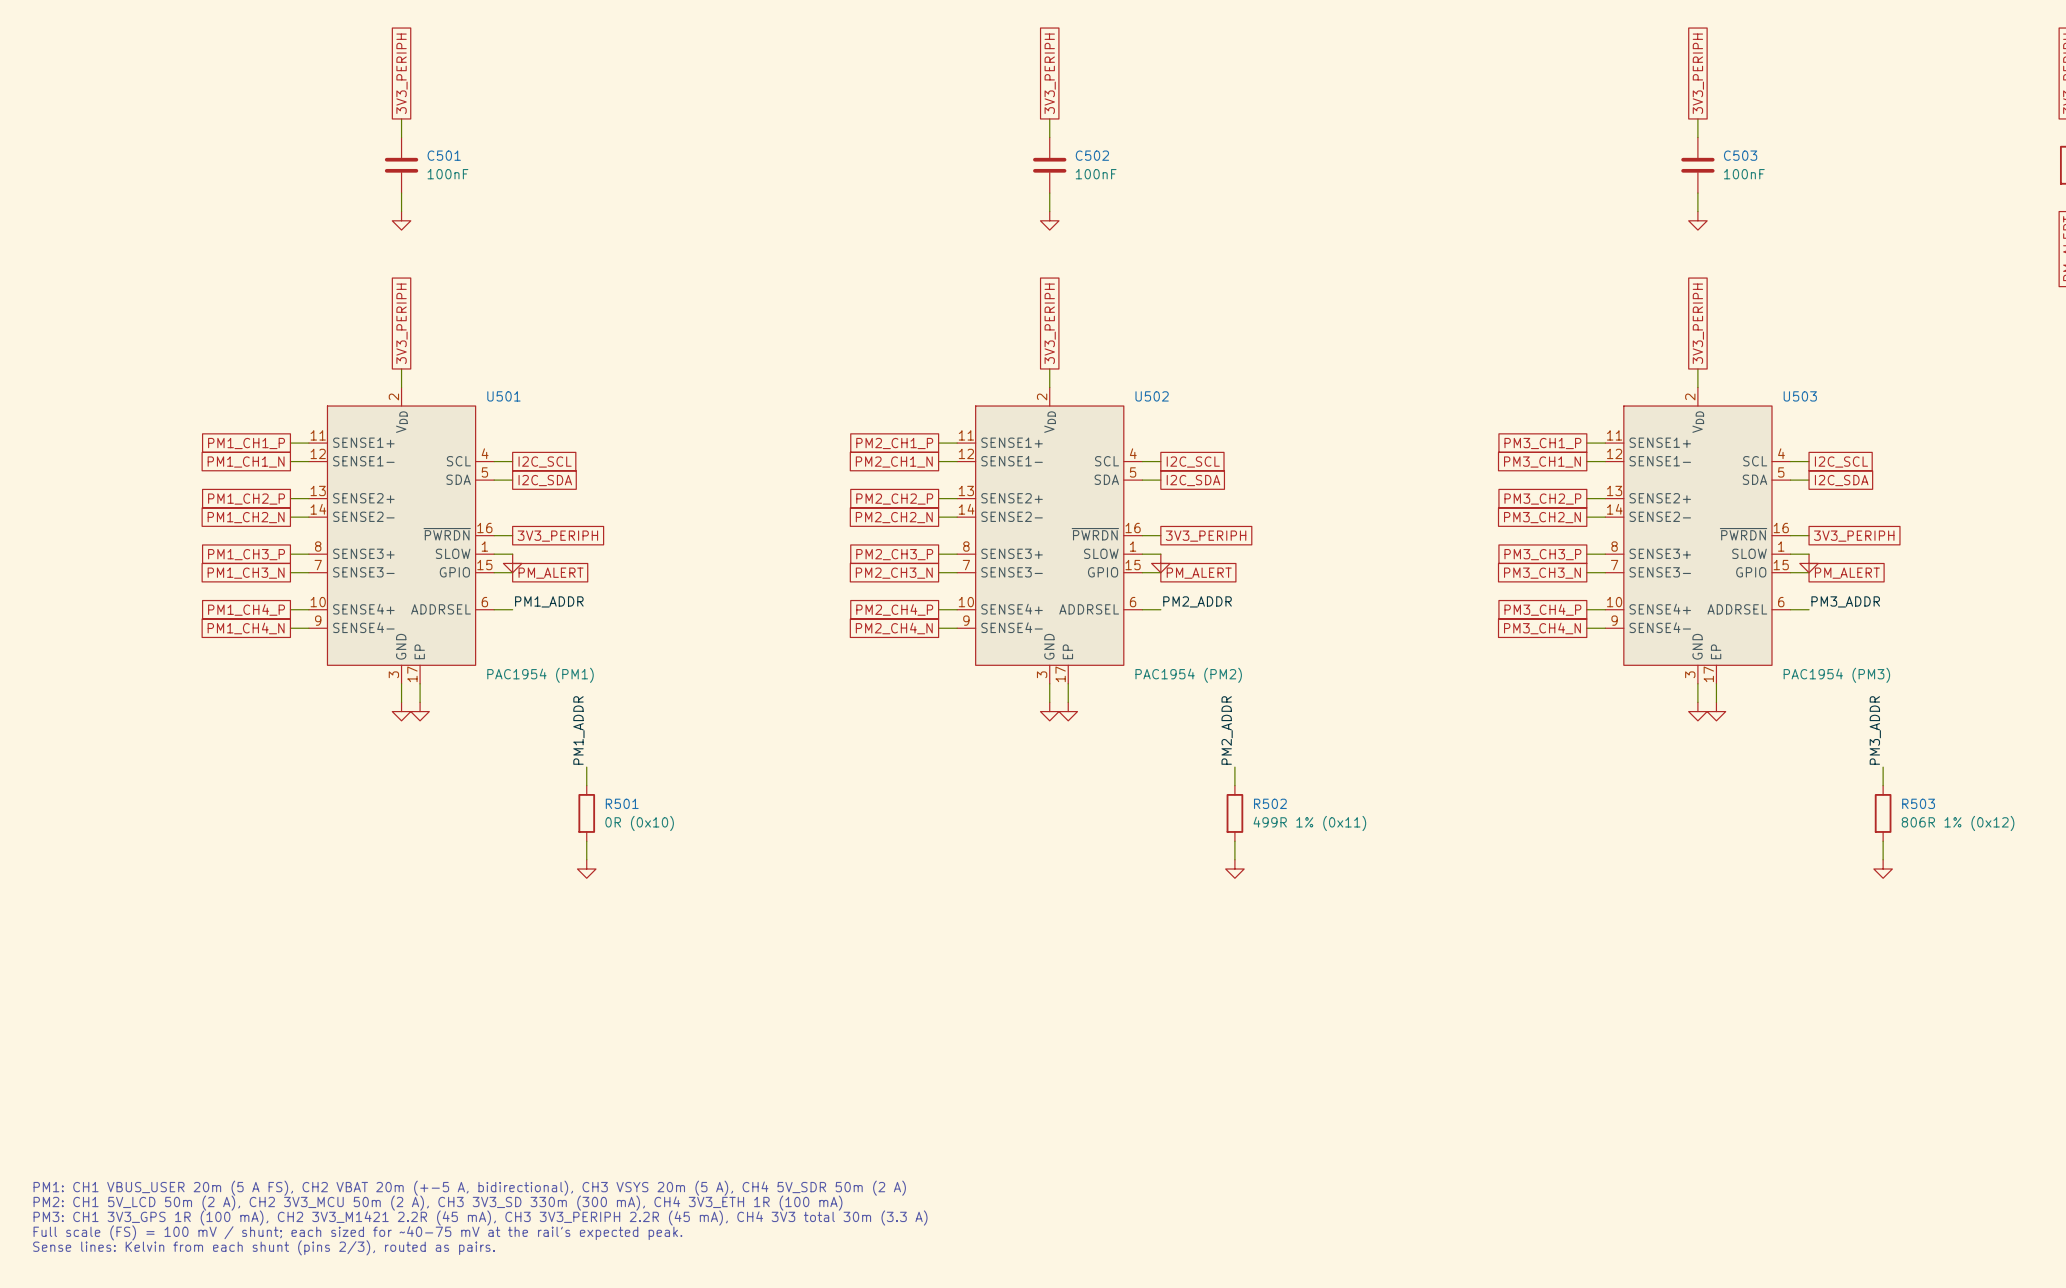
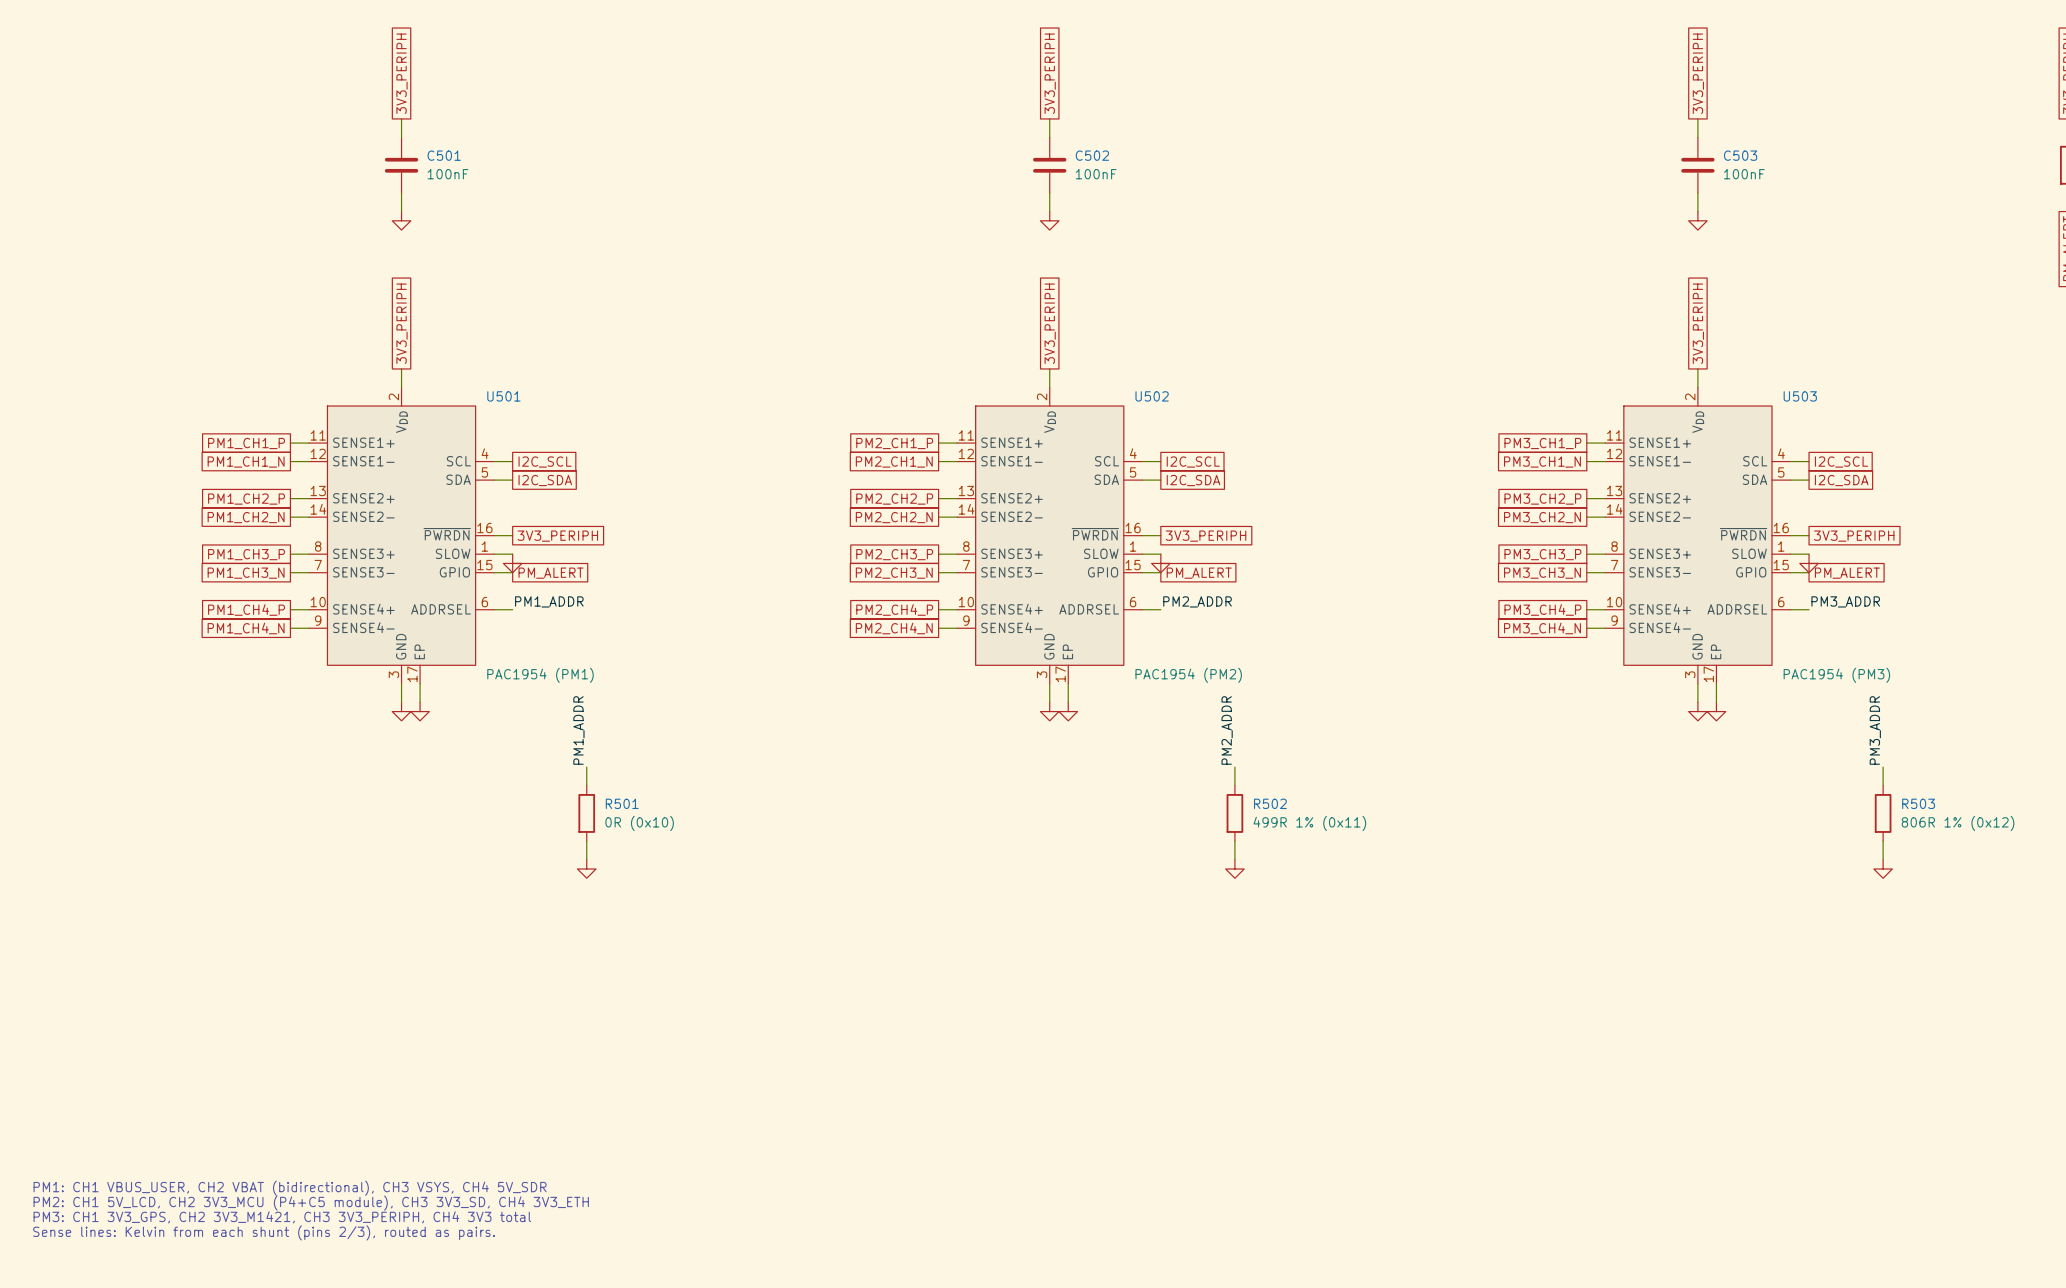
text: PM1: CH1 VBUS_USER 20m (5 A FS), CH2 VBAT 20m (+-5 A, bidirectional), CH3 VSYS 20m (5 A), CH4 5V_SDR 50m (2 A) (469, 1188) -> PM1: CH1 VBUS_USER, CH2 VBAT (bidirectional), CH3 VSYS, CH4 5V_SDR (290, 1188)
text: PM2: CH1 5V_LCD 50m (2 A), CH2 3V3_MCU 50m (2 A), CH3 3V3_SD 330m (300 mA), CH4 3V3_ETH 1R (100 mA) (437, 1203) -> PM2: CH1 5V_LCD, CH2 3V3_MCU (P4+C5 module), CH3 3V3_SD, CH4 3V3_ETH (311, 1203)
text: PM3: CH1 3V3_GPS 1R (100 mA), CH2 3V3_M1421 2.2R (45 mA), CH3 3V3_PERIPH 2.2R (45 mA), CH4 3V3 total 30m (3.3 A) (480, 1218) -> PM3: CH1 3V3_GPS, CH2 3V3_M1421, CH3 3V3_PERIPH, CH4 3V3 total (282, 1217)
text: Full scale (FS) = 100 mV / shunt; each sized for ~40-75 mV at the rail's expected peak. (357, 1232) -> Sense lines: Kelvin from each shunt (pins 2/3), routed as pairs. (264, 1232)
text: Sense lines: Kelvin from each shunt (pins 2/3), routed as pairs. (264, 1247) -> none

